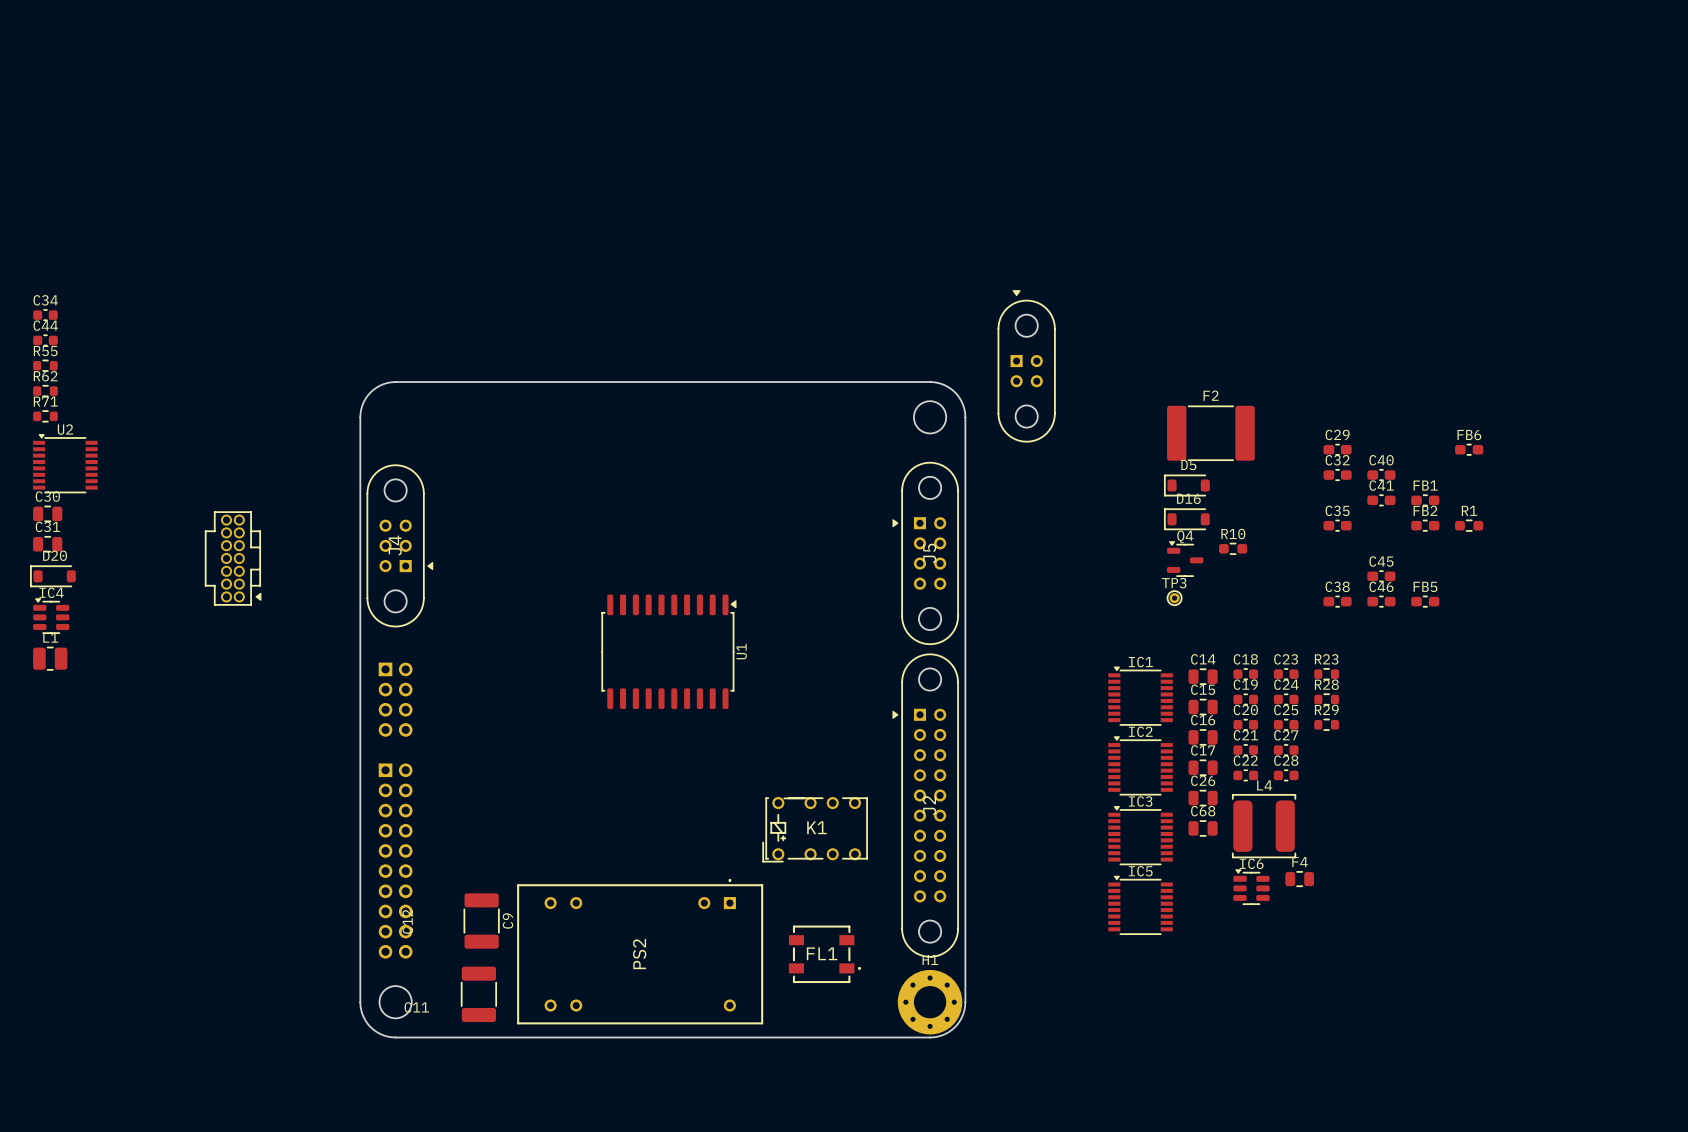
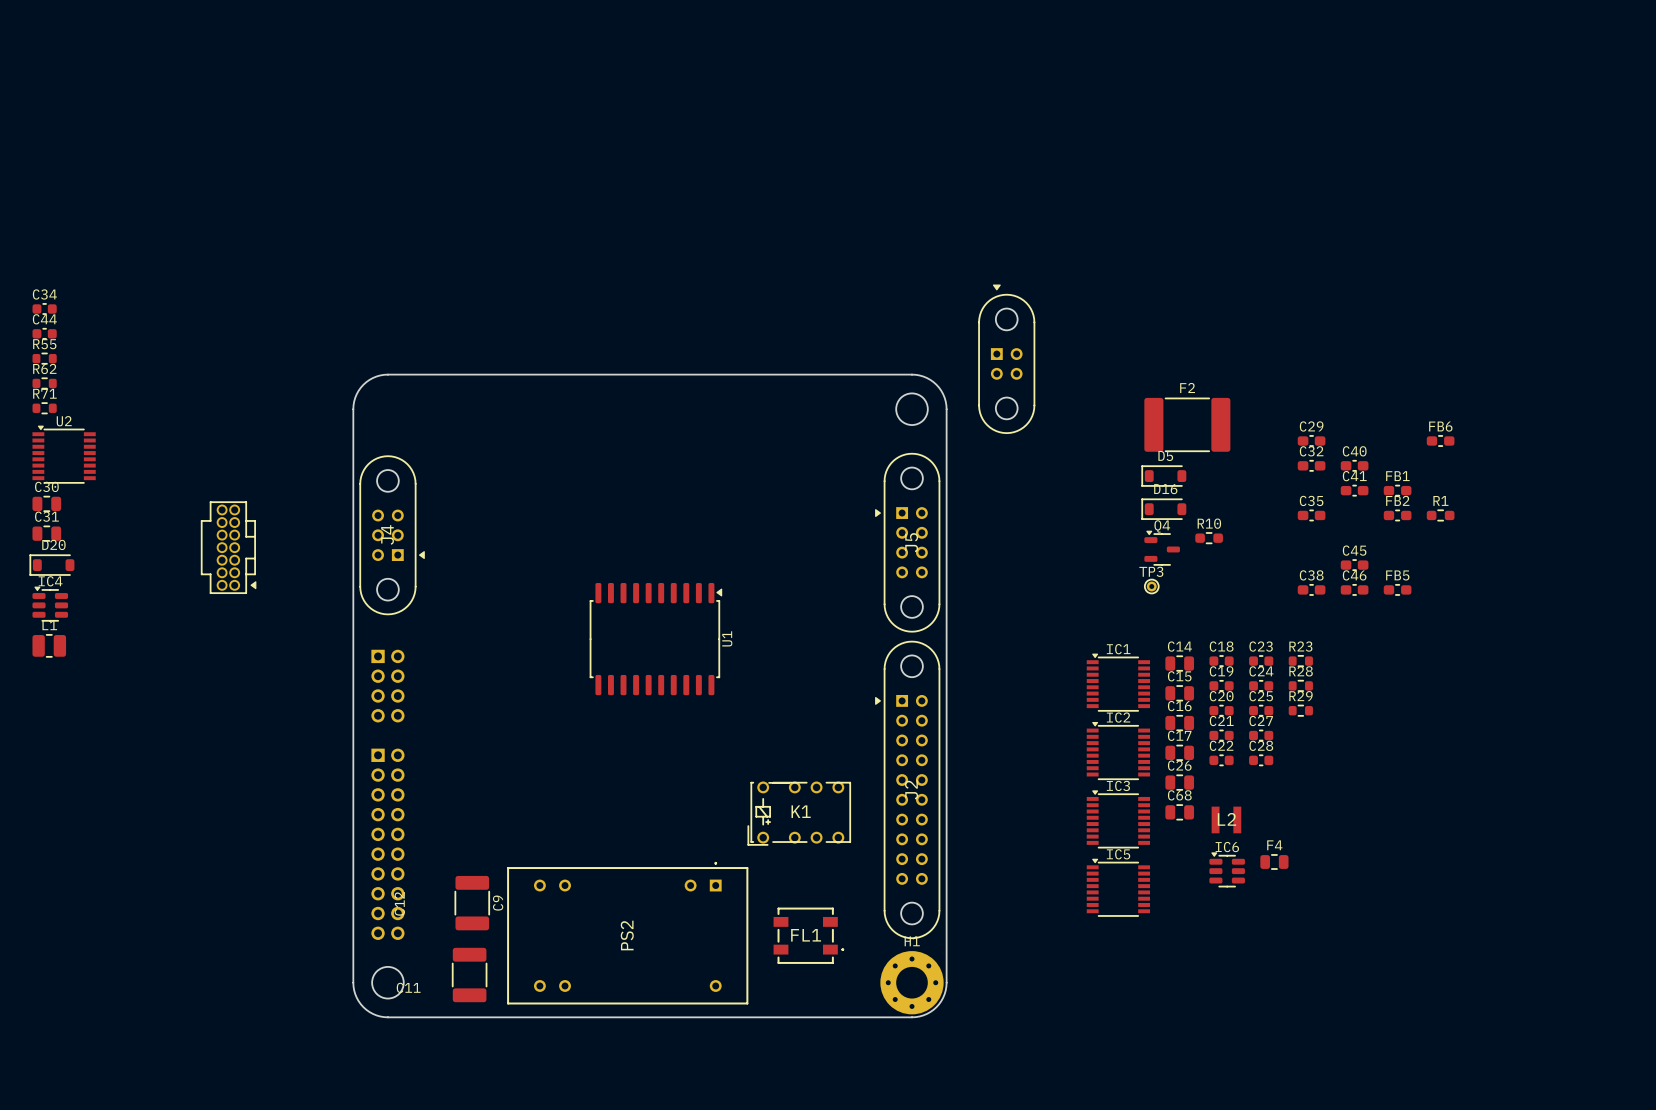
L4: (1264, 826) -> none
L2: none -> (1226, 819)

